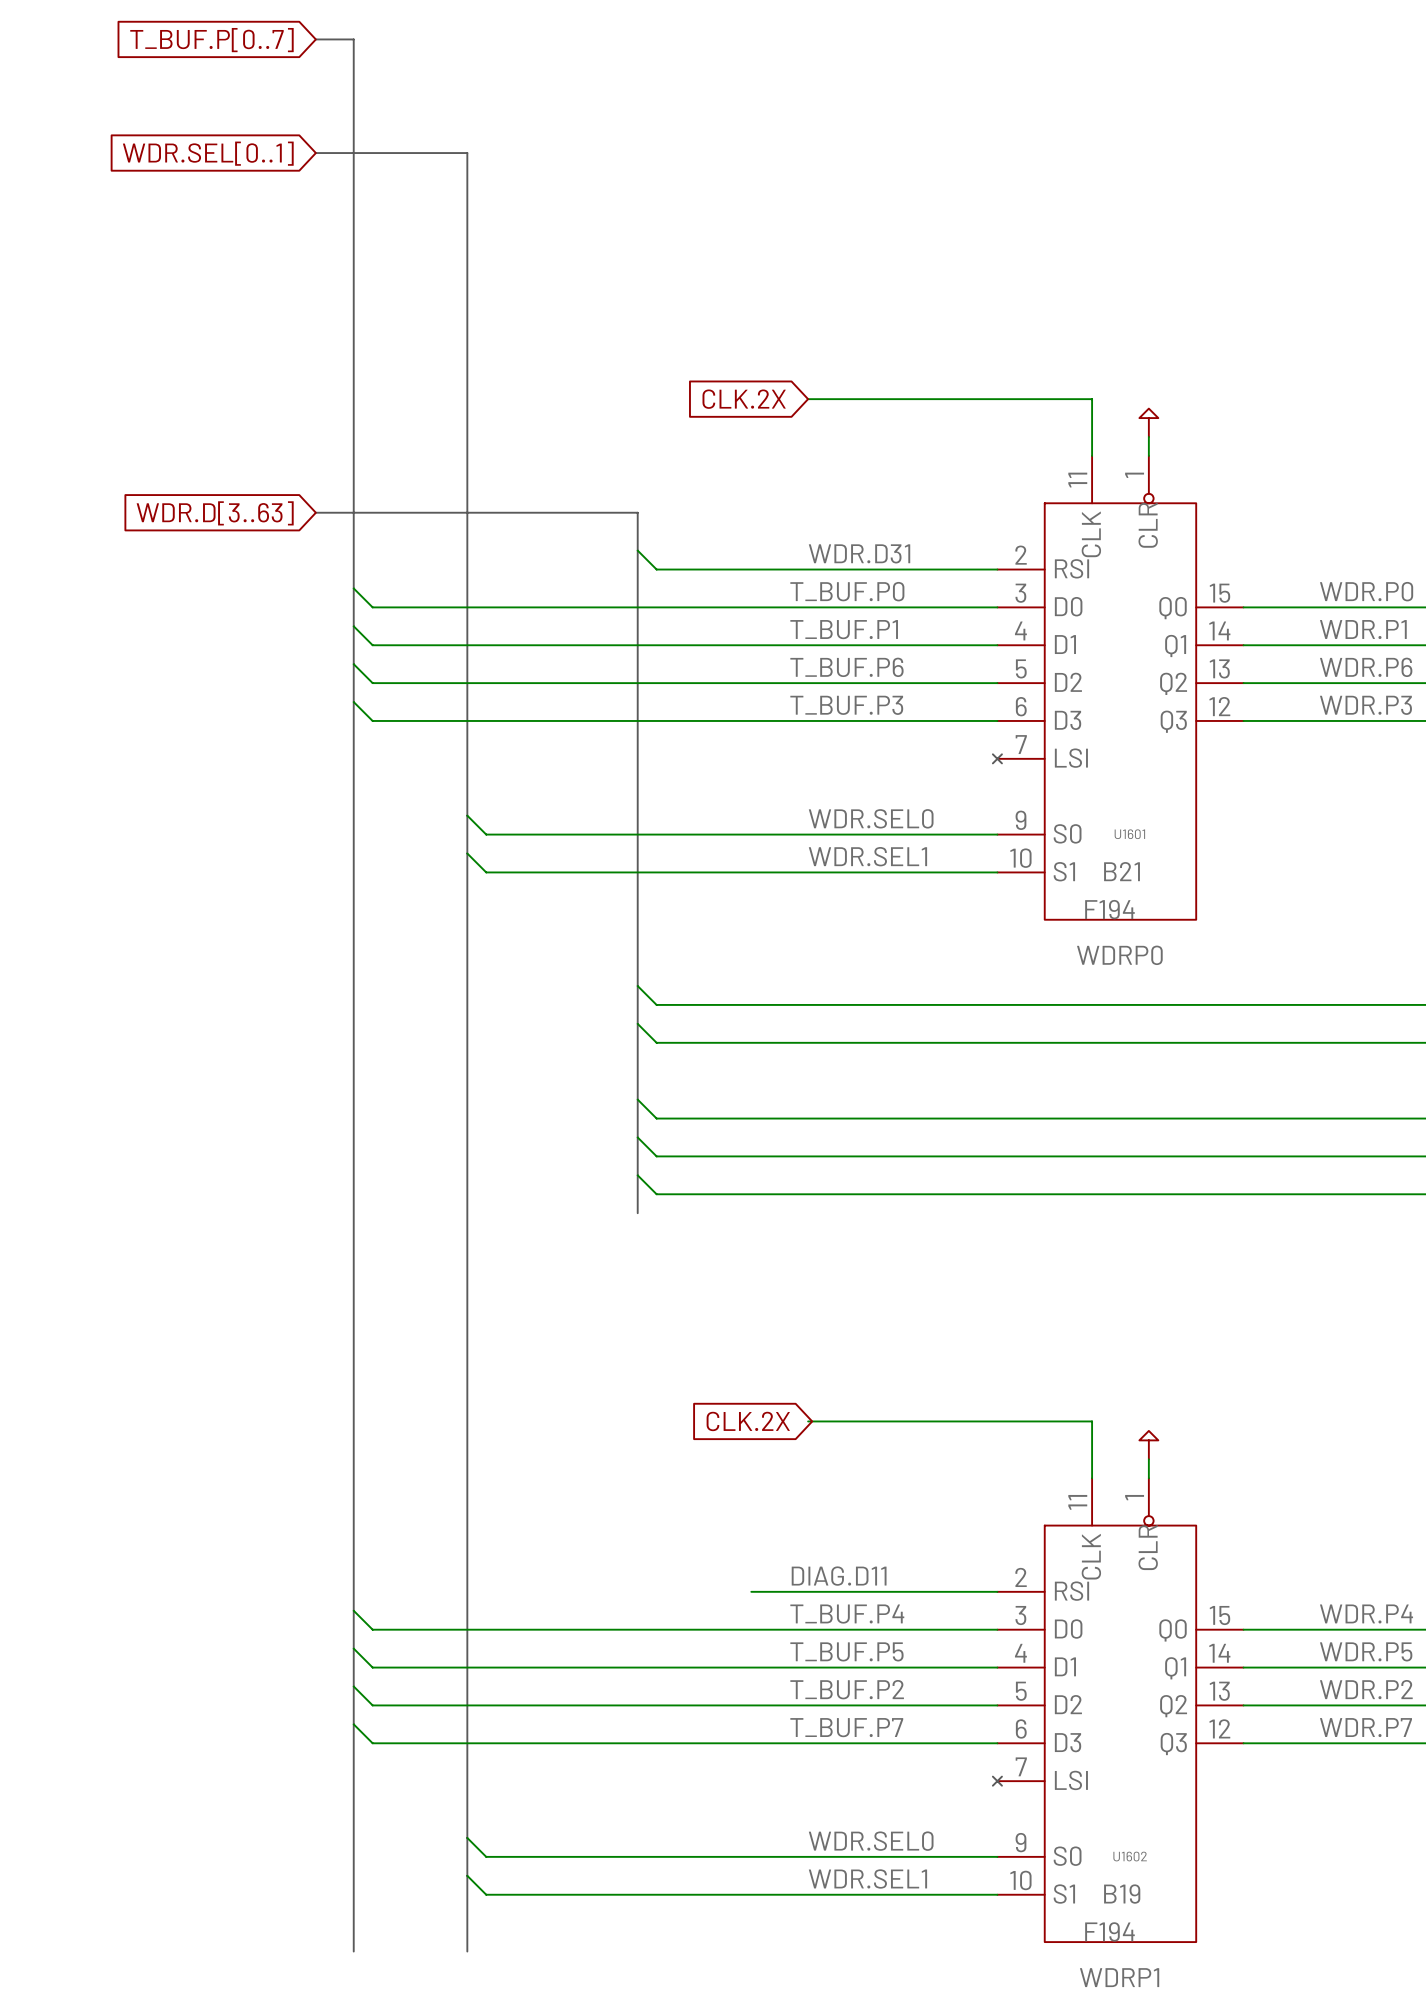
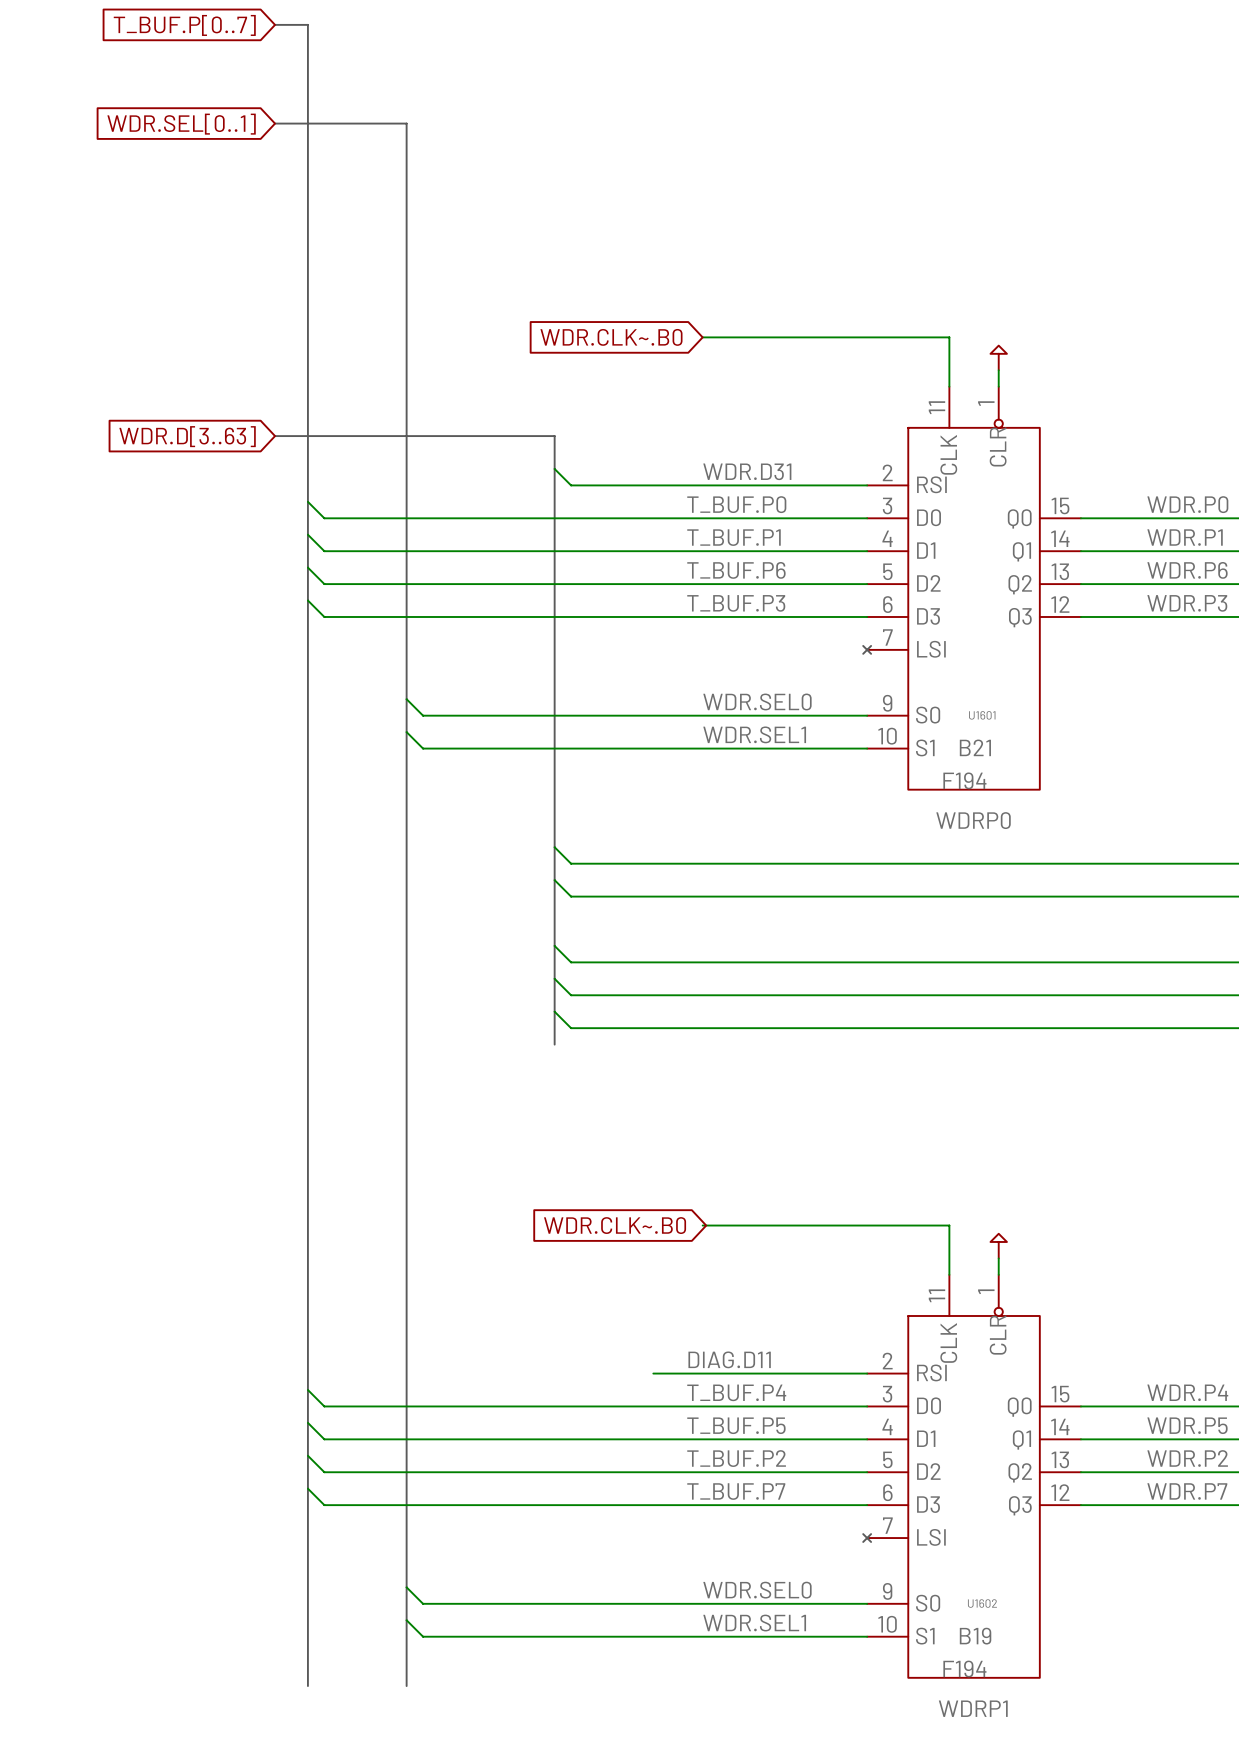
global label: CLK.2X (744, 399) -> WDR.CLK~.B0 (611, 337)
global label: CLK.2X (748, 1421) -> WDR.CLK~.B0 (615, 1225)

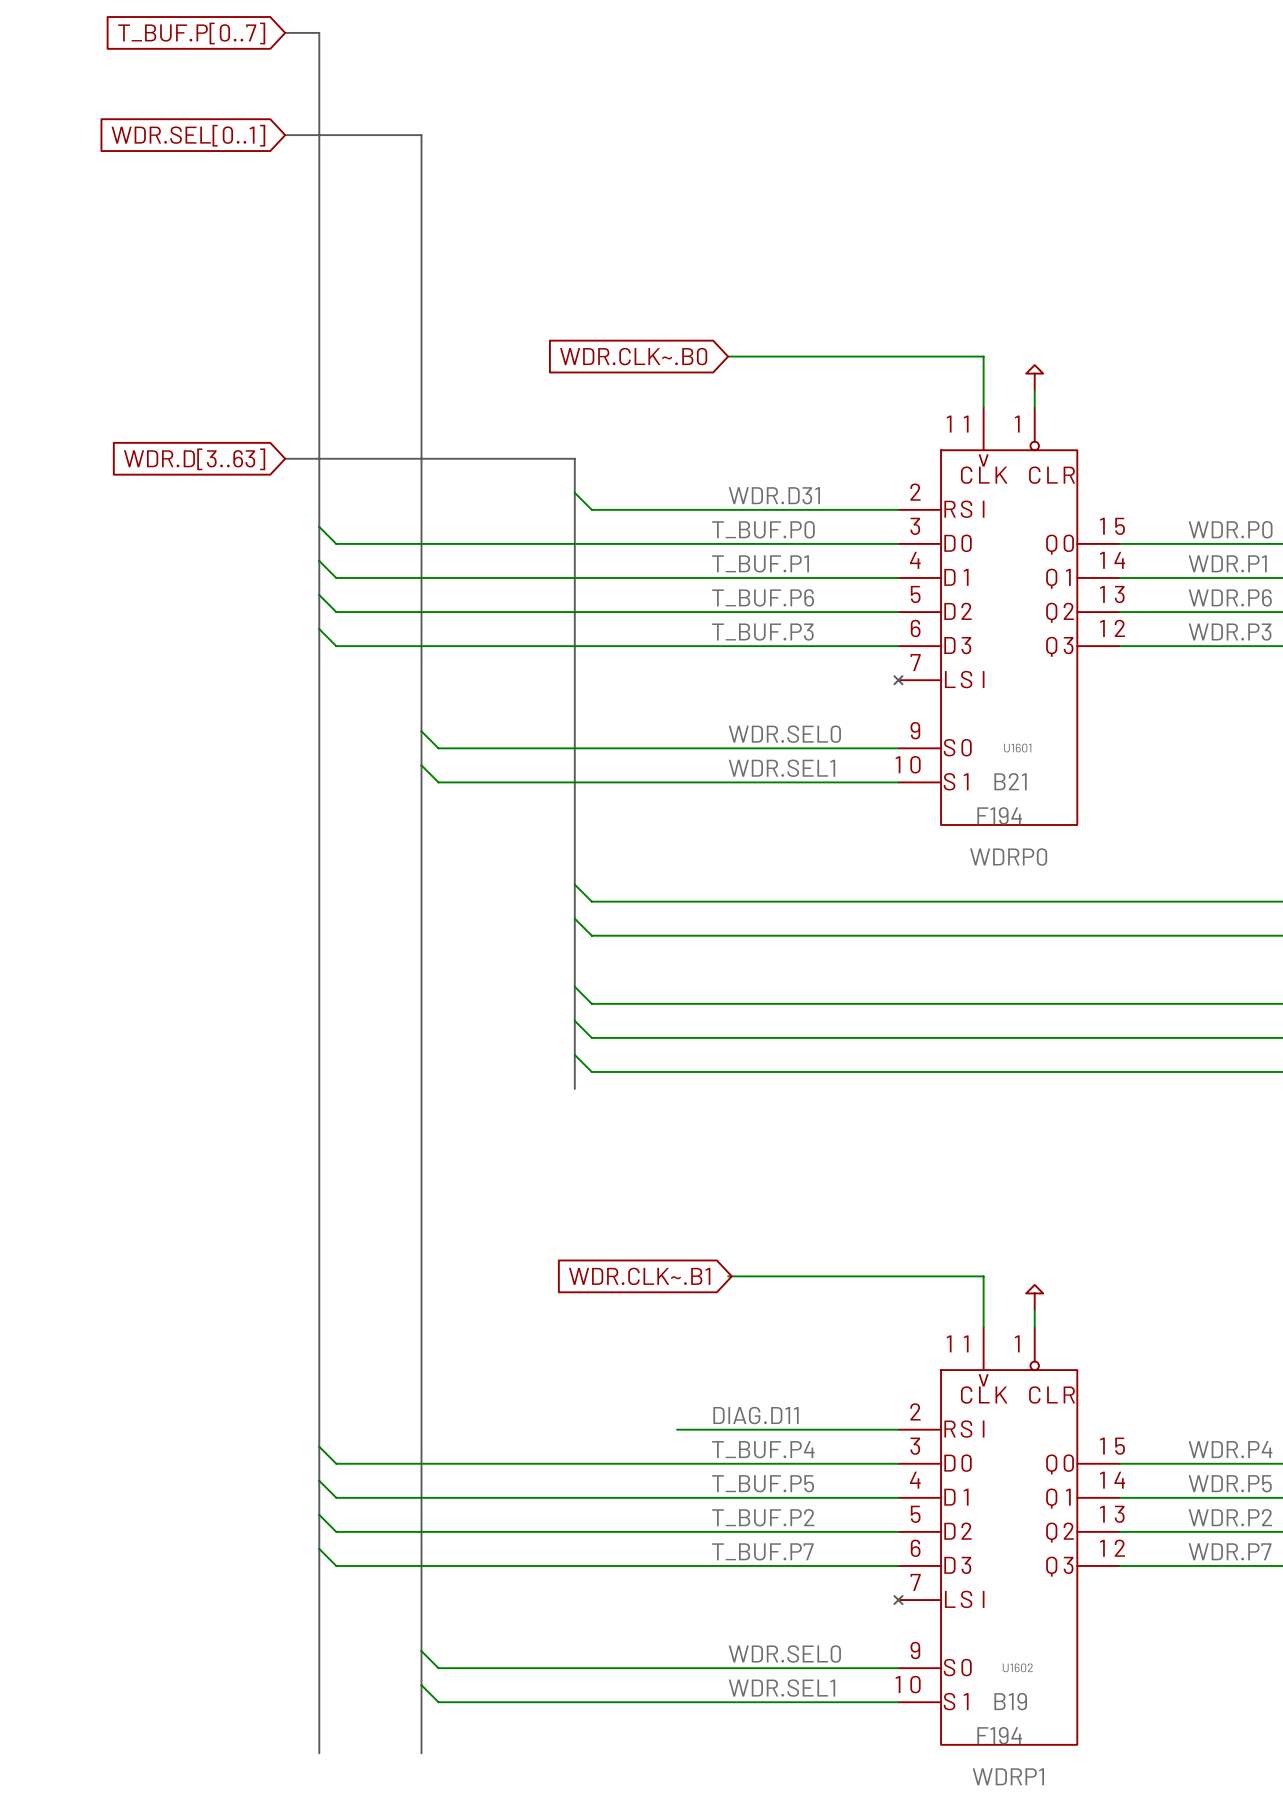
U1601 symbol: [867, 386, 1081, 790] -> [898, 407, 1120, 825]
global label: WDR.CLK~.B0 (615, 1225) -> WDR.CLK~.B1 (639, 1276)
U1602 symbol: [867, 1274, 1081, 1678] -> [898, 1327, 1120, 1745]

